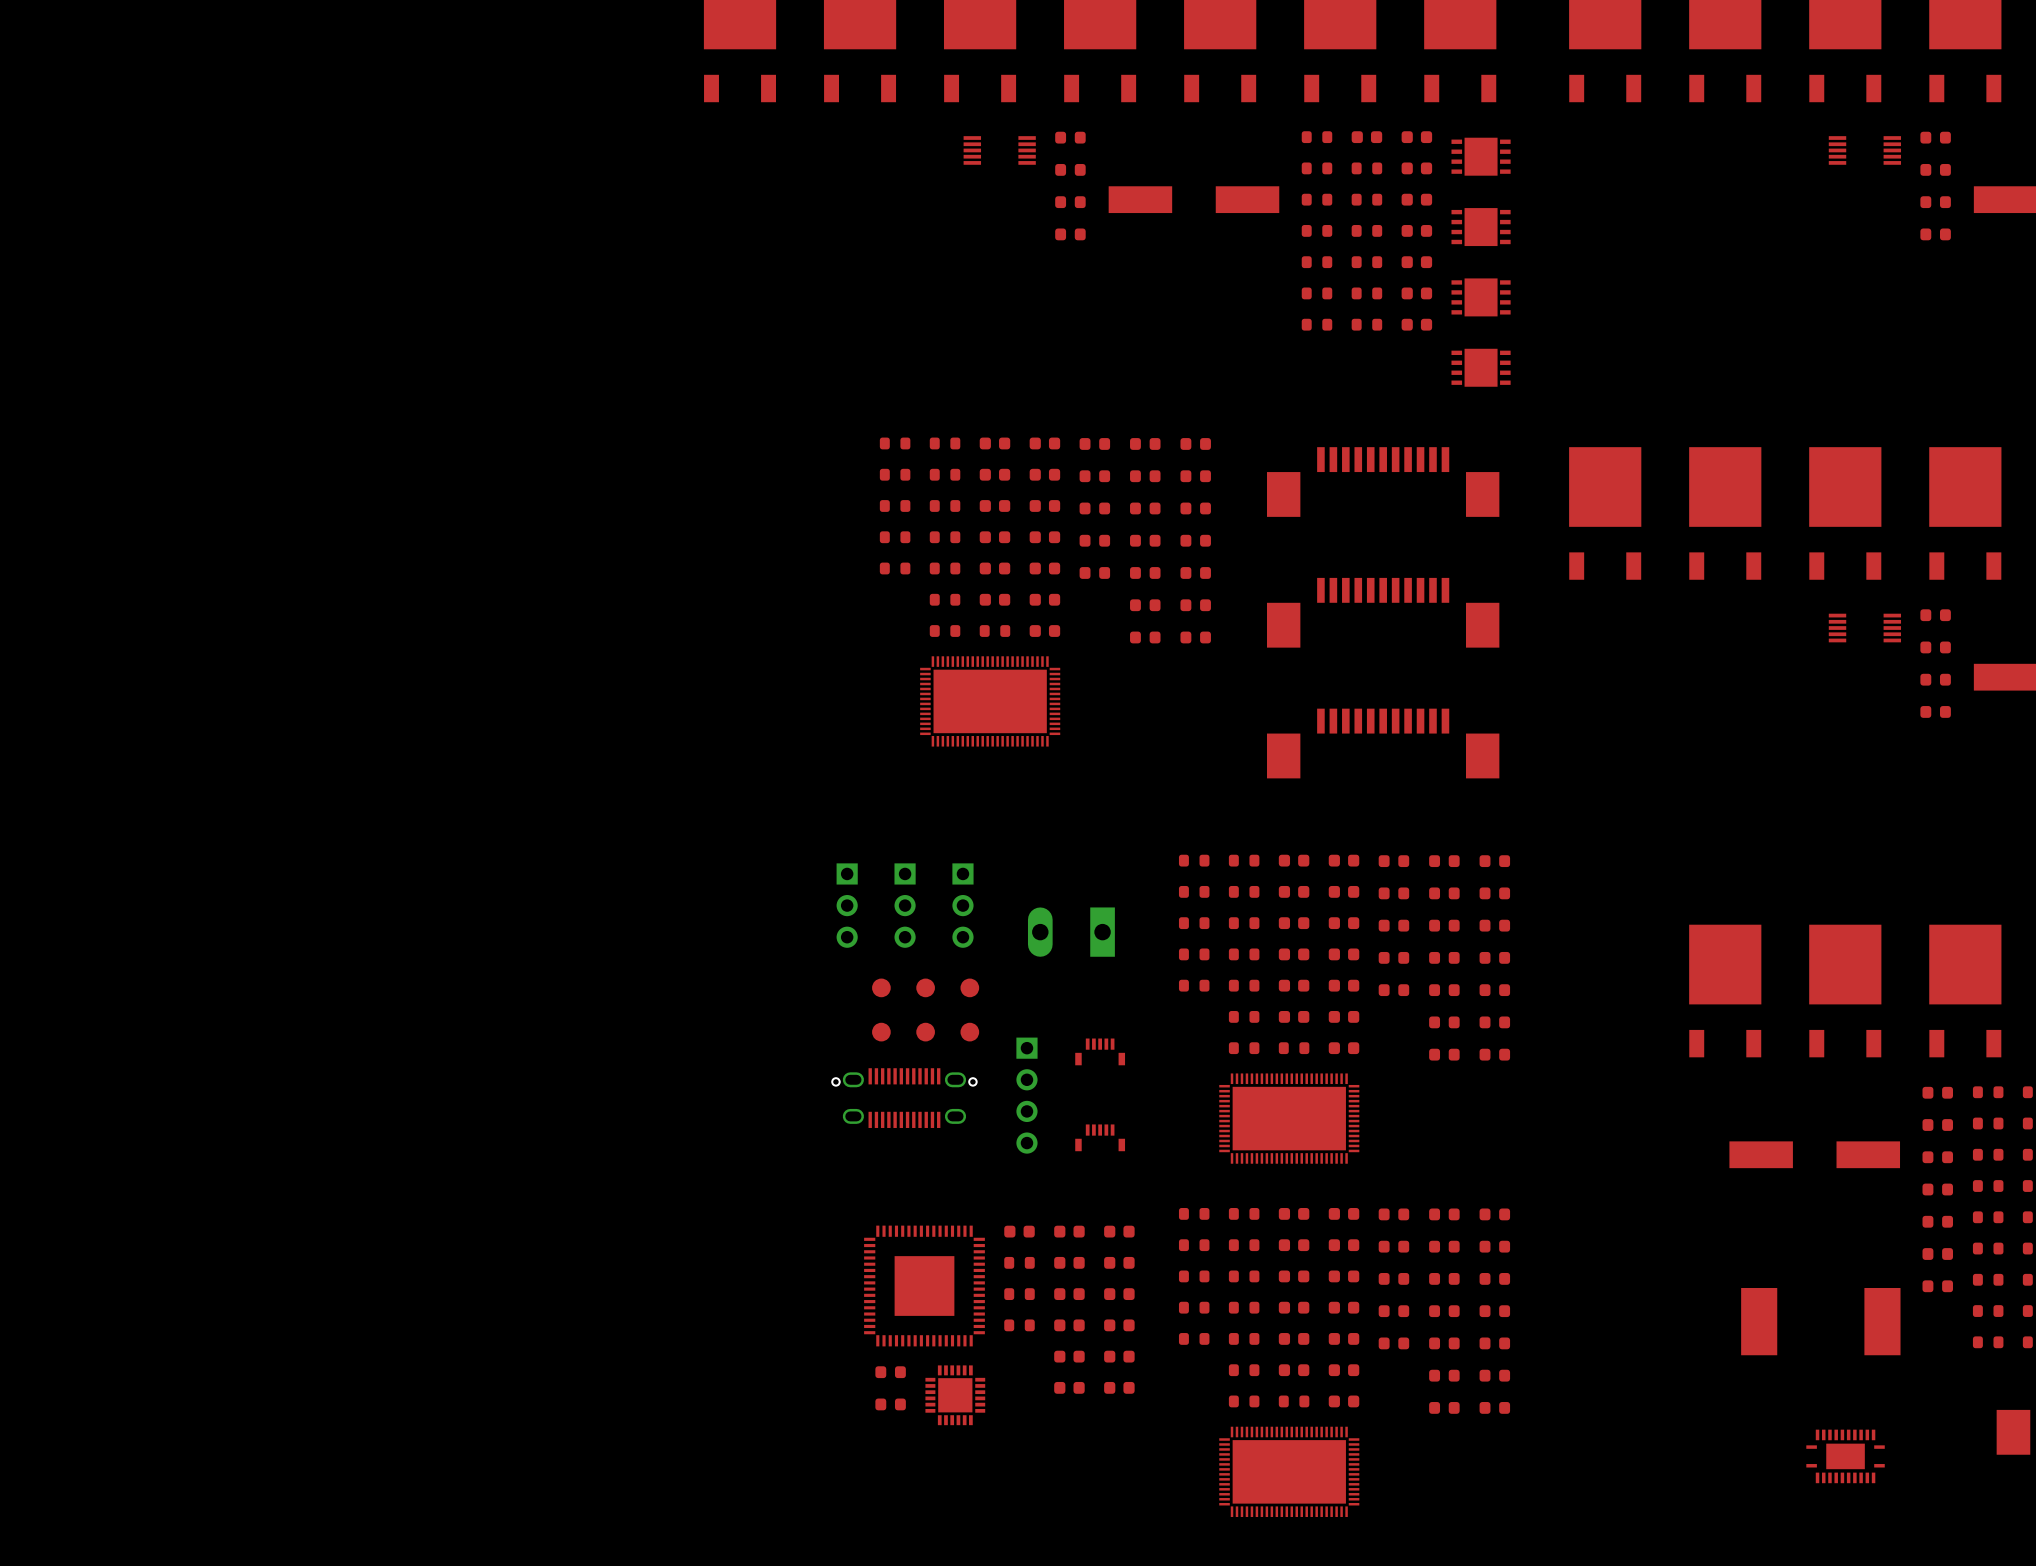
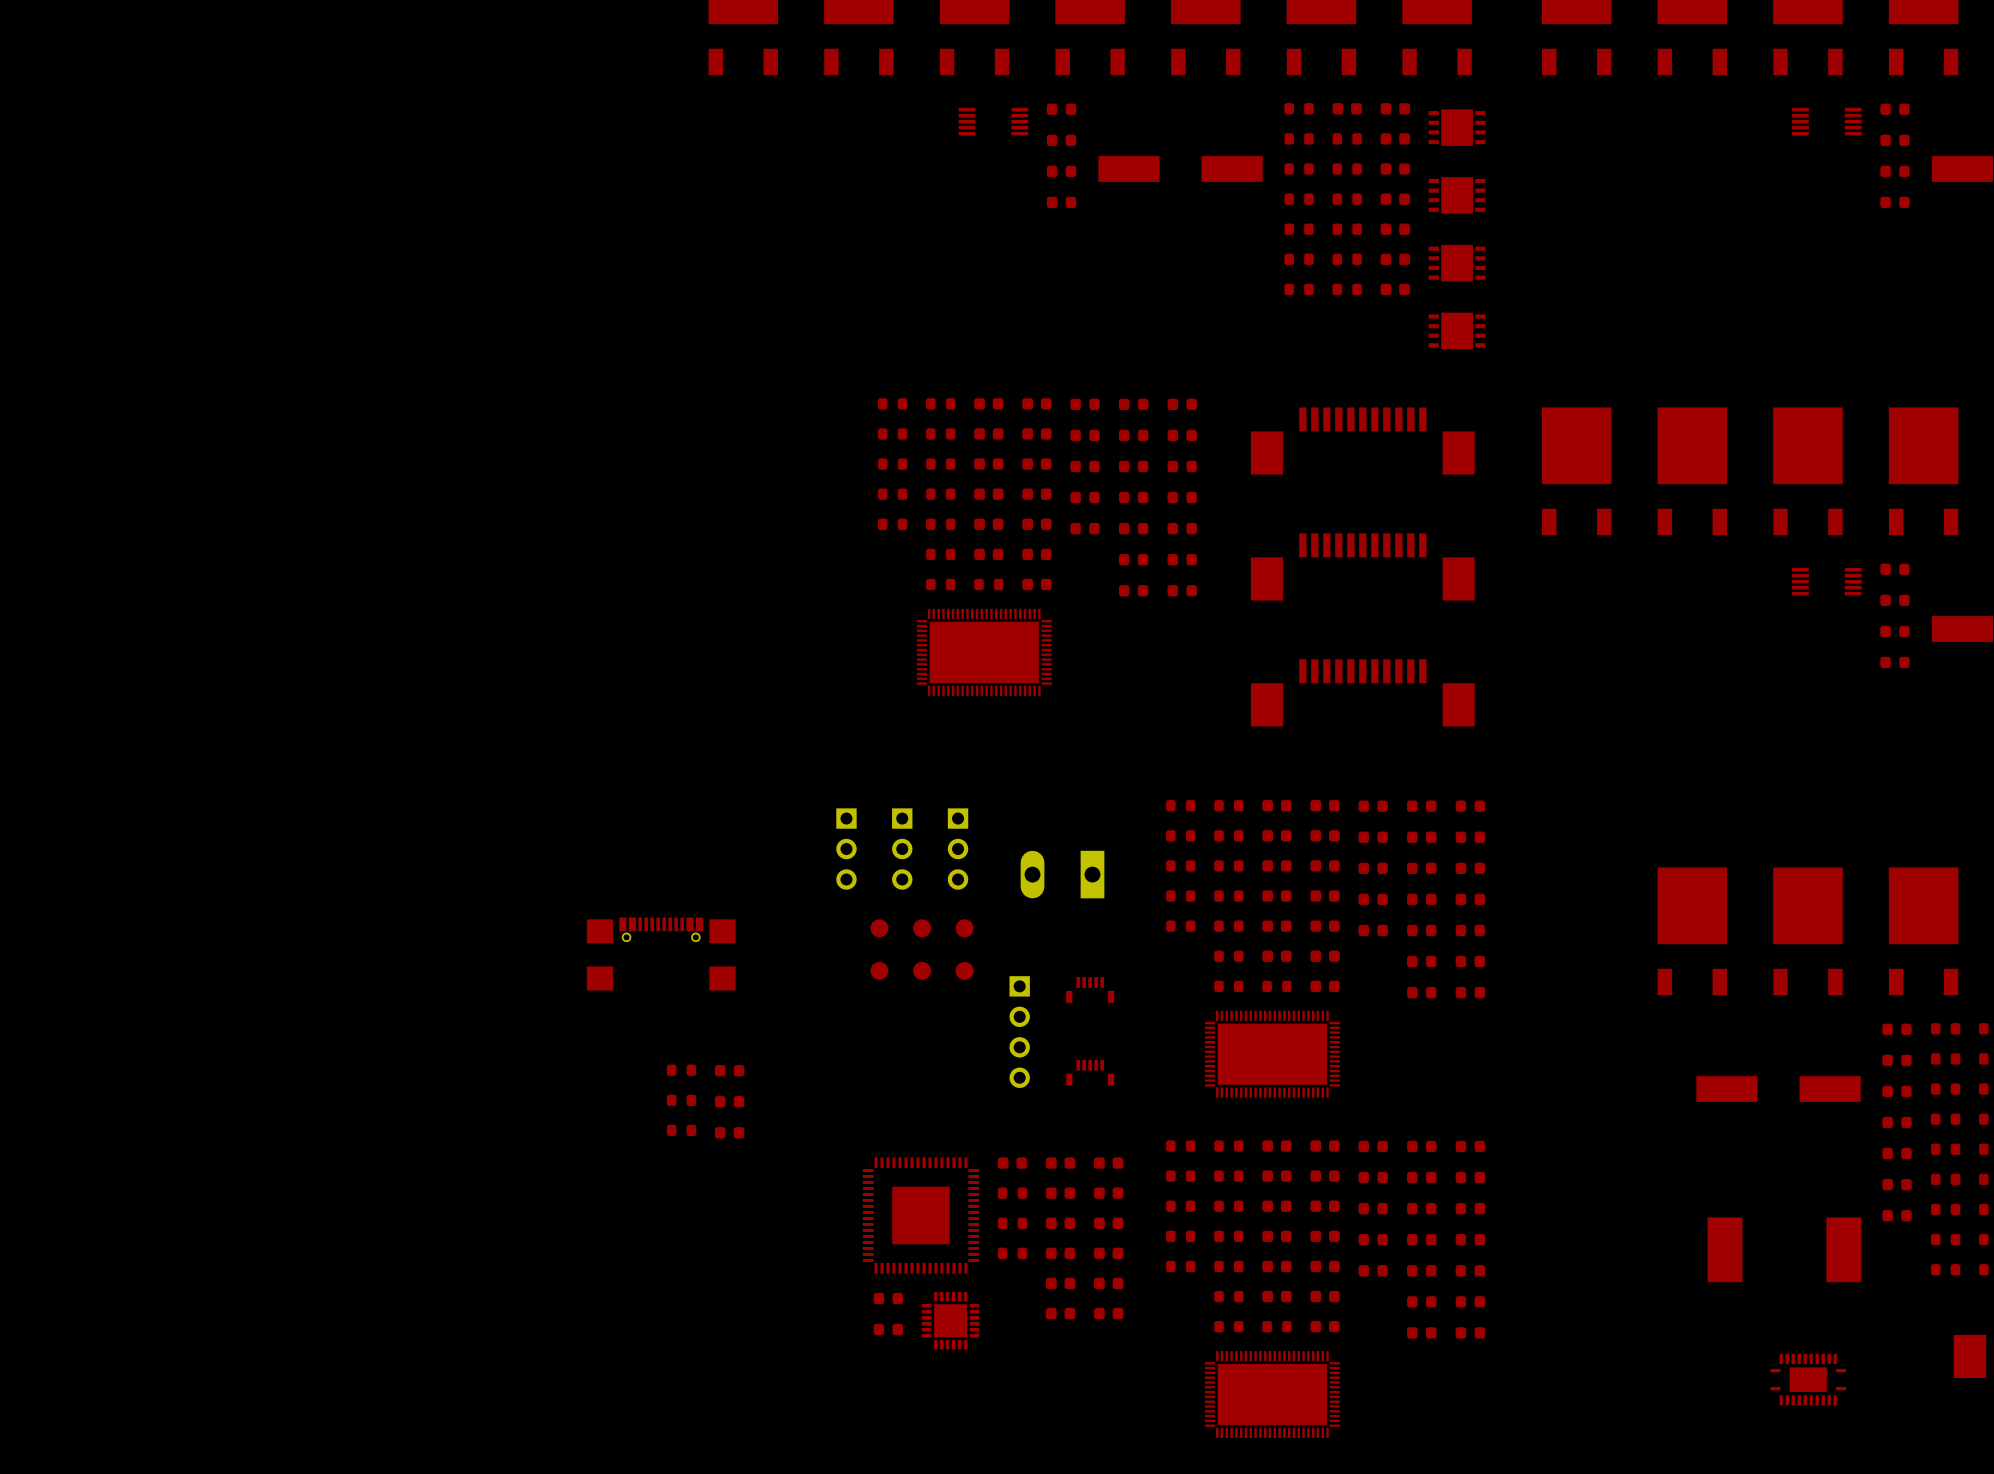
part: none -> (661, 954)
part: (904, 1098) -> none
part: none -> (681, 1070)
part: none -> (729, 1070)
part: none -> (681, 1100)
part: none -> (729, 1101)
part: none -> (681, 1130)
part: none -> (729, 1132)

